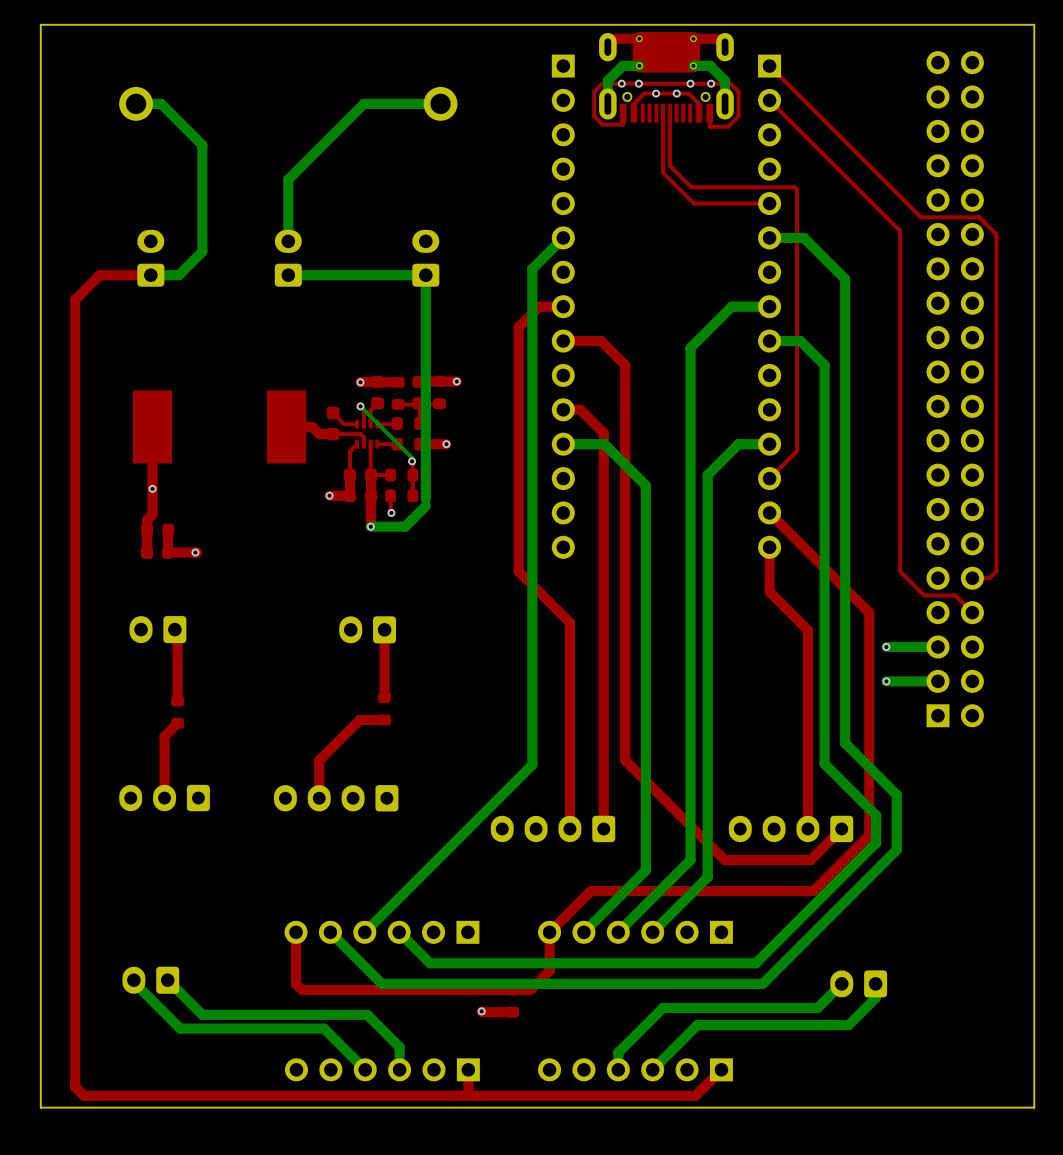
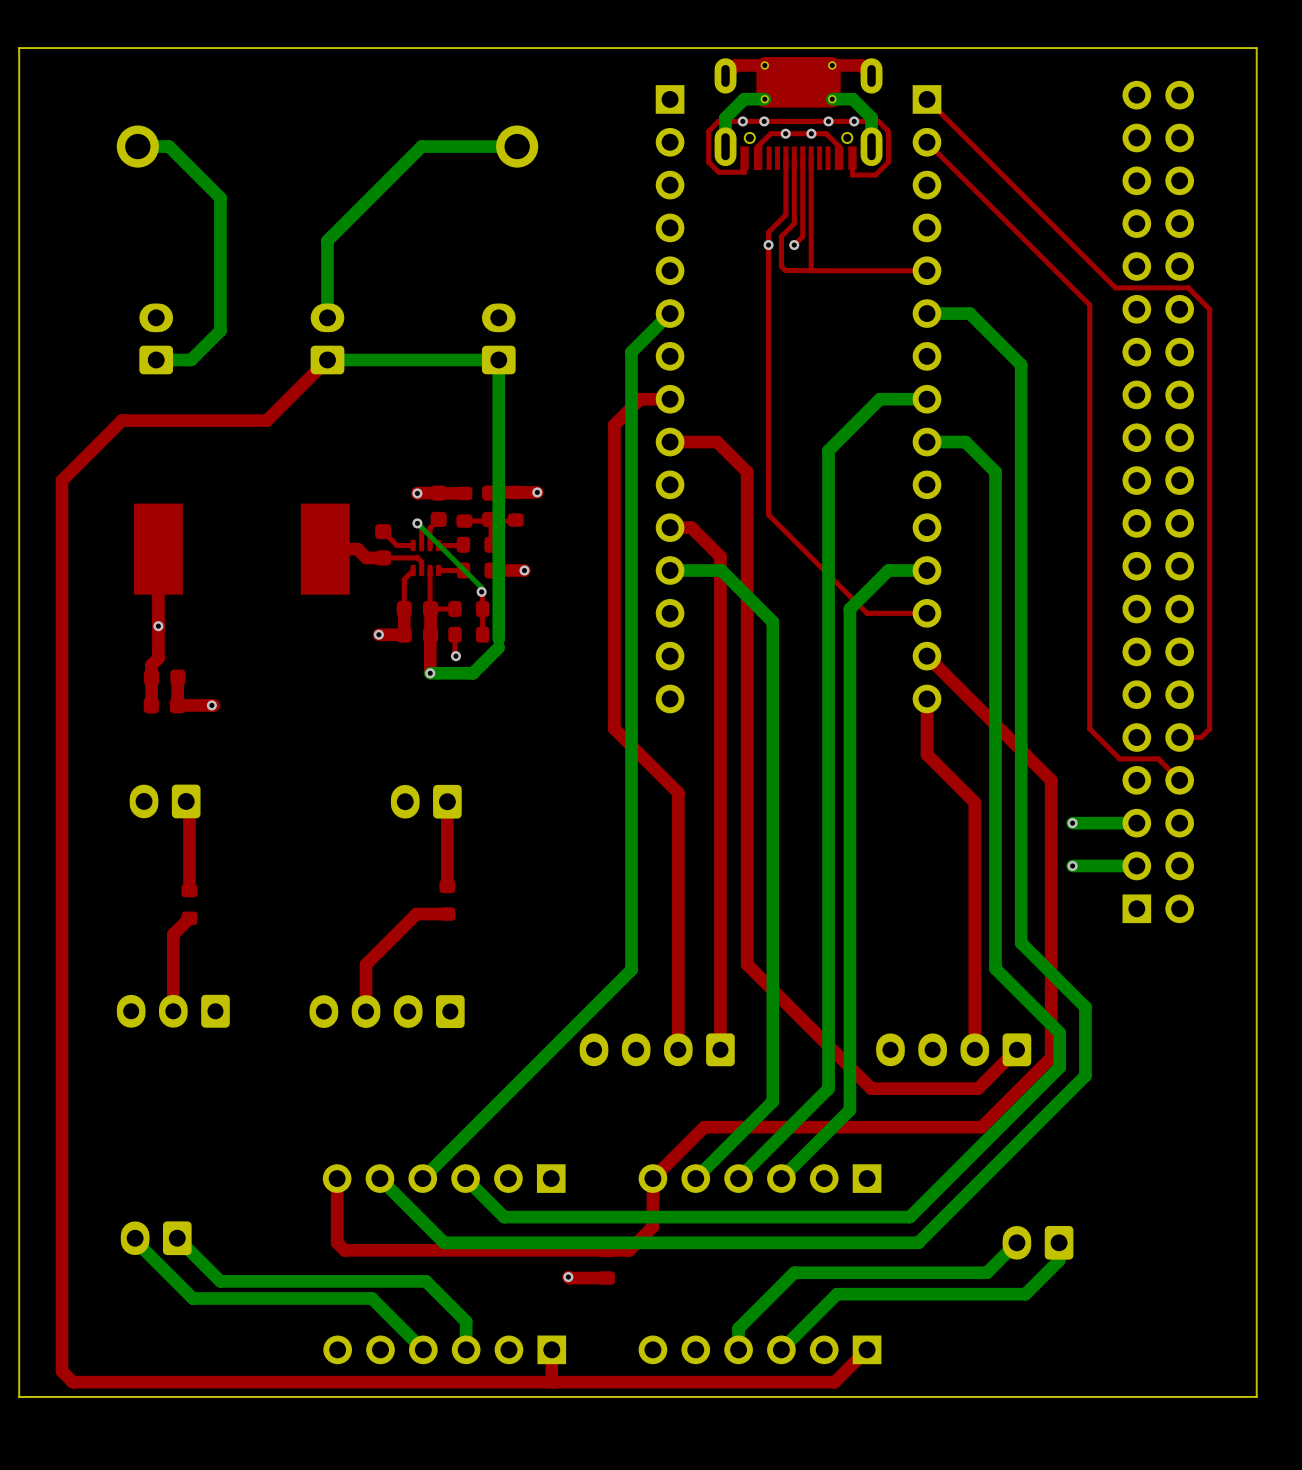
top track: none -> (811, 158) (811, 270) (785, 270) (781, 266) (781, 236) (794, 223)
top track: (663, 165) (663, 172) (693, 203) -> (811, 270) (832, 270)
top track: (669, 165) (691, 187) (794, 187) (797, 189) (797, 451) (769, 478) -> (785, 158) (785, 214) (768, 232) (768, 514) (867, 613) (927, 613)
top track: none -> (802, 223) (802, 236) (794, 245)
via: none -> (768, 245)
via: none -> (794, 245)
top track: (150, 275) (99, 275) (75, 299) (75, 372) -> (327, 359) (266, 420) (121, 420) (62, 480)

